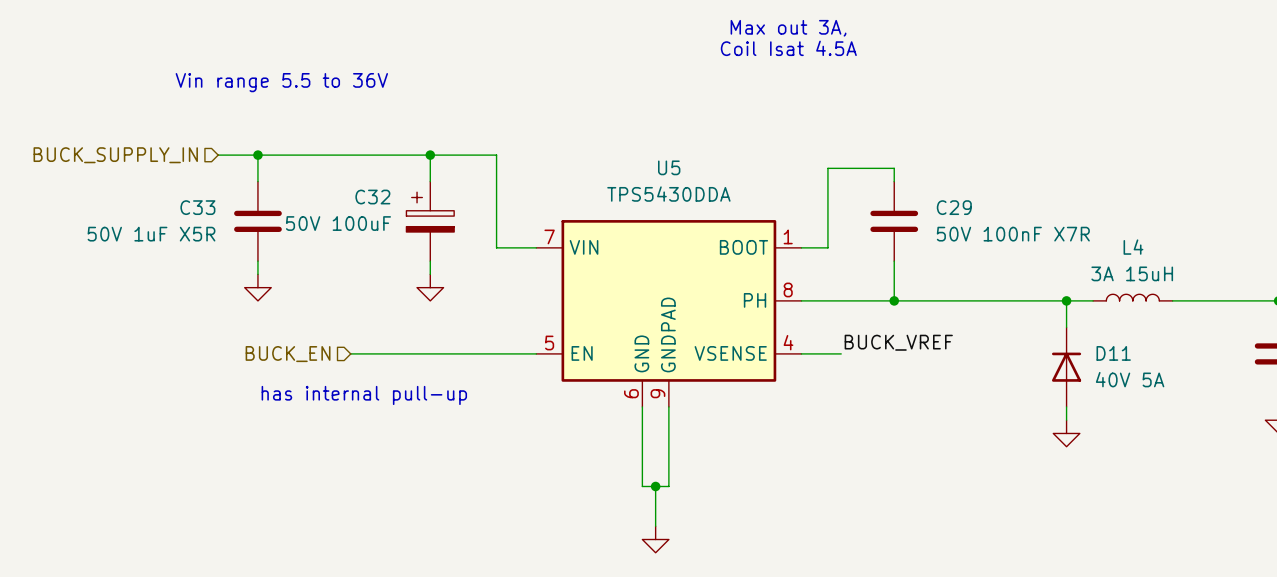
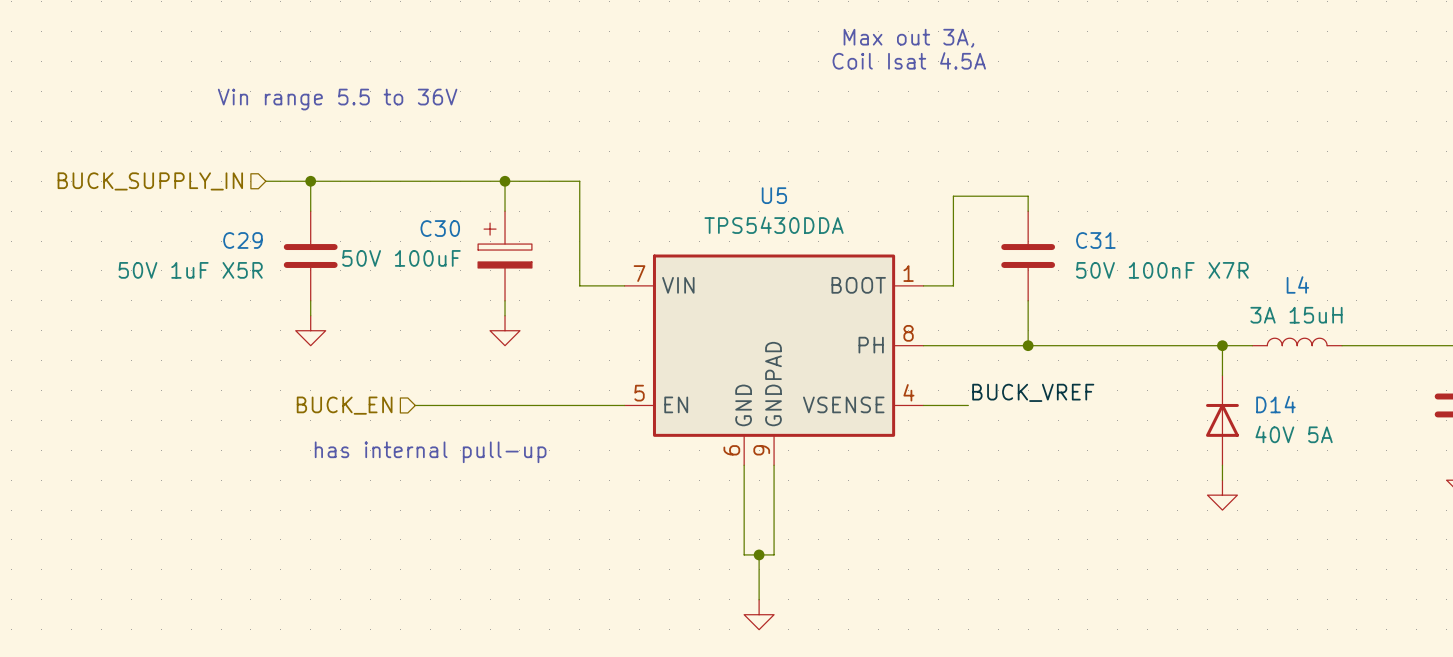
C32 name: C32 (372, 197) -> C30 (440, 228)
C33 name: C33 (197, 207) -> C29 (242, 240)
C29 name: C29 (954, 207) -> C31 (1095, 240)
D11 name: D11 (1113, 353) -> D14 (1275, 404)

